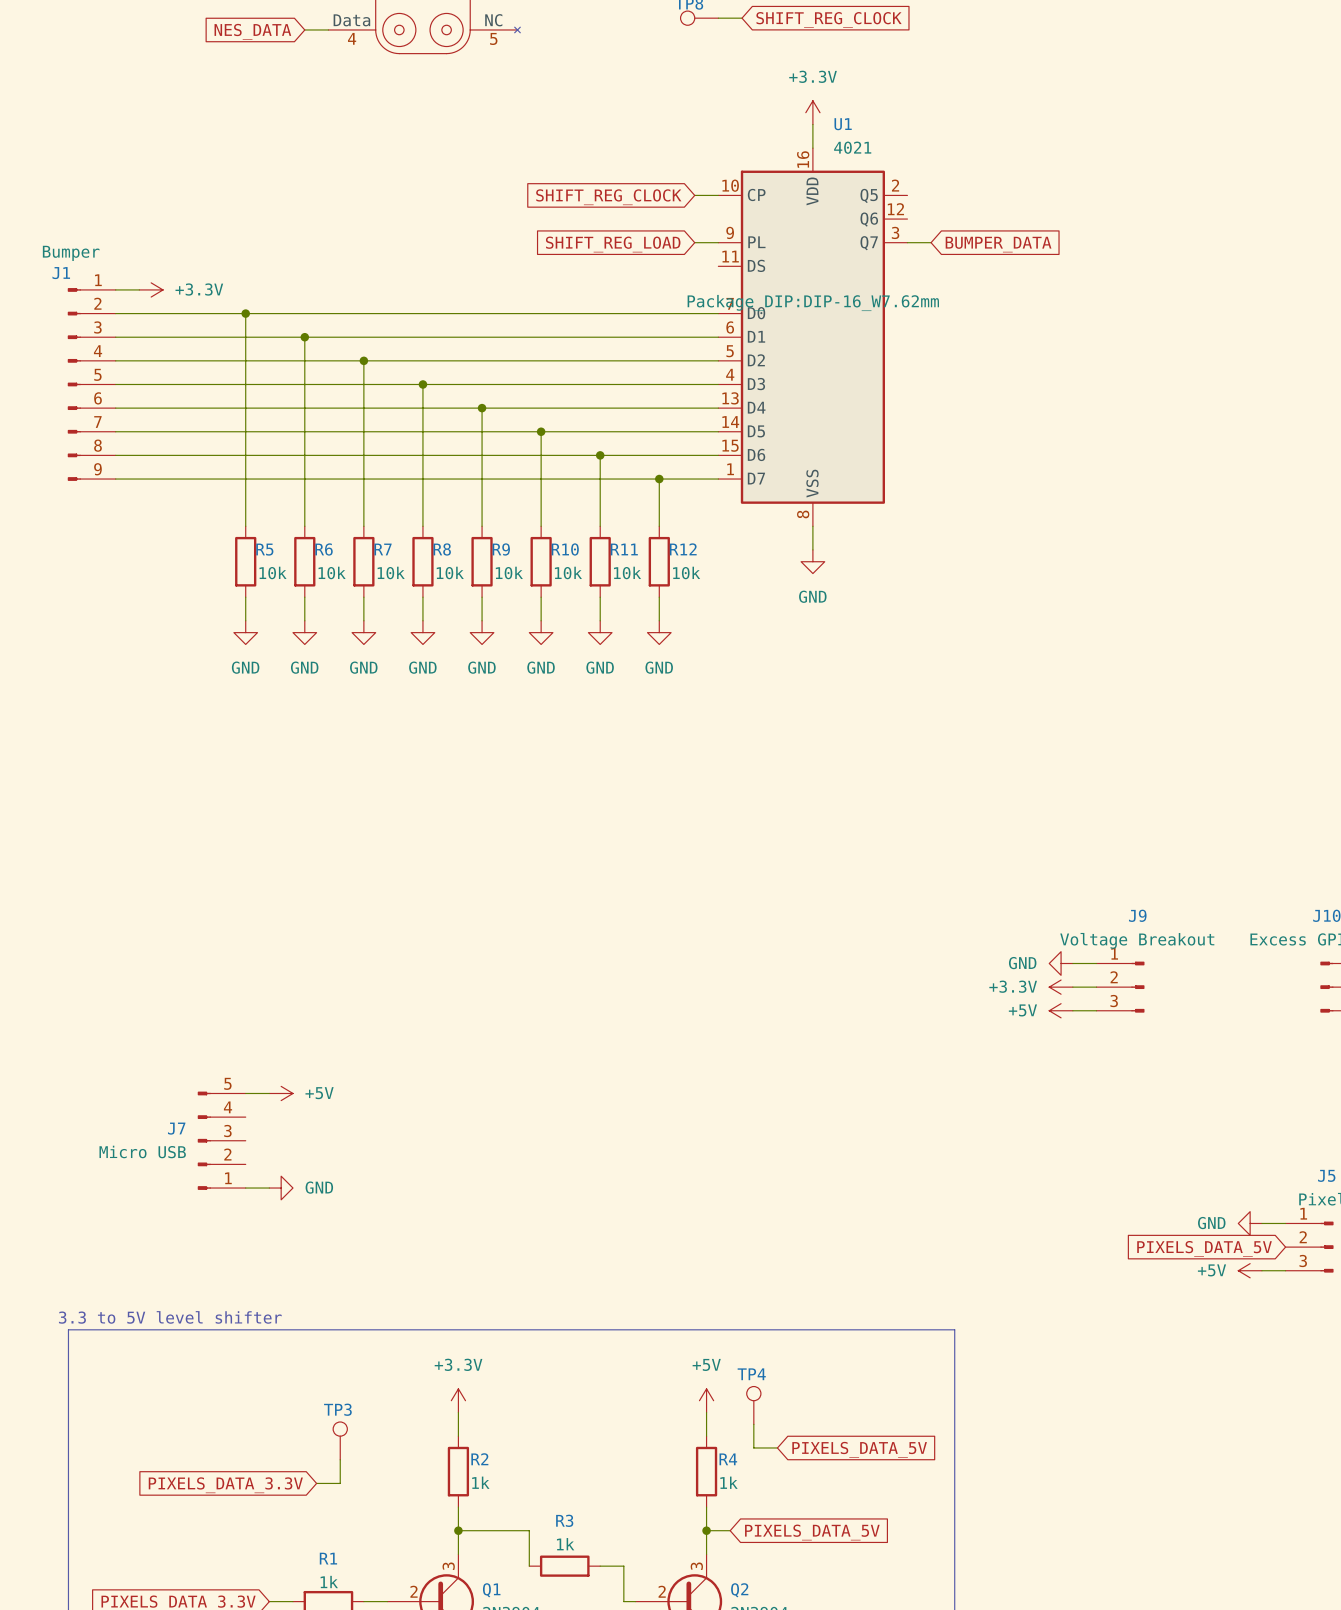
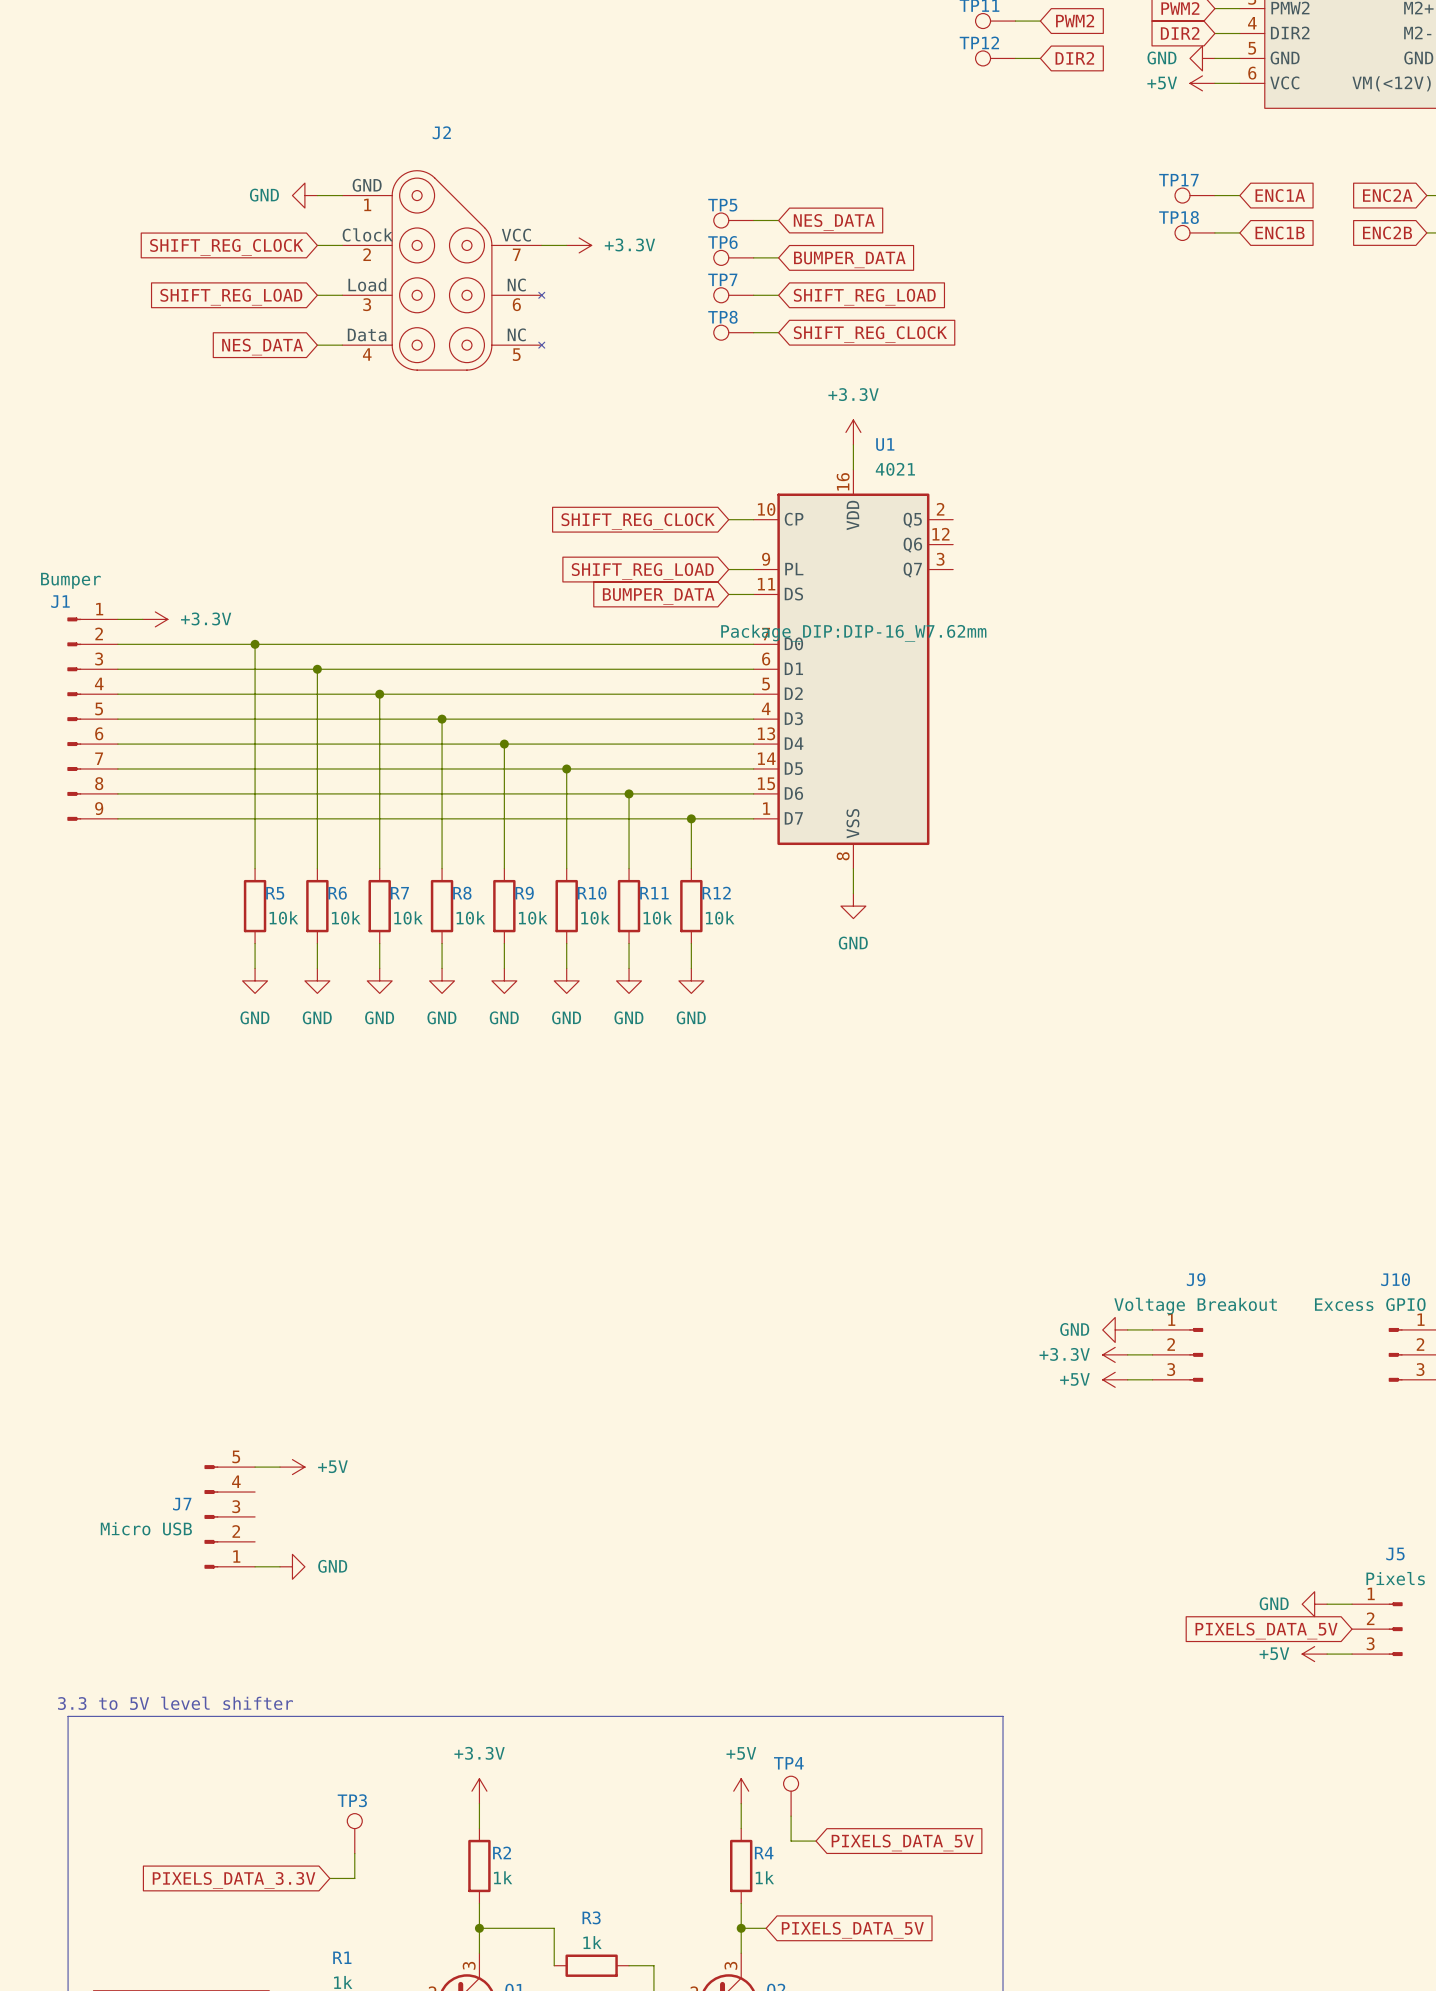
wire: (907, 242) (931, 242) -> (728, 594) (753, 594)
global label: BUMPER_DATA (998, 244) -> none
global label: none -> BUMPER_DATA (658, 596)

